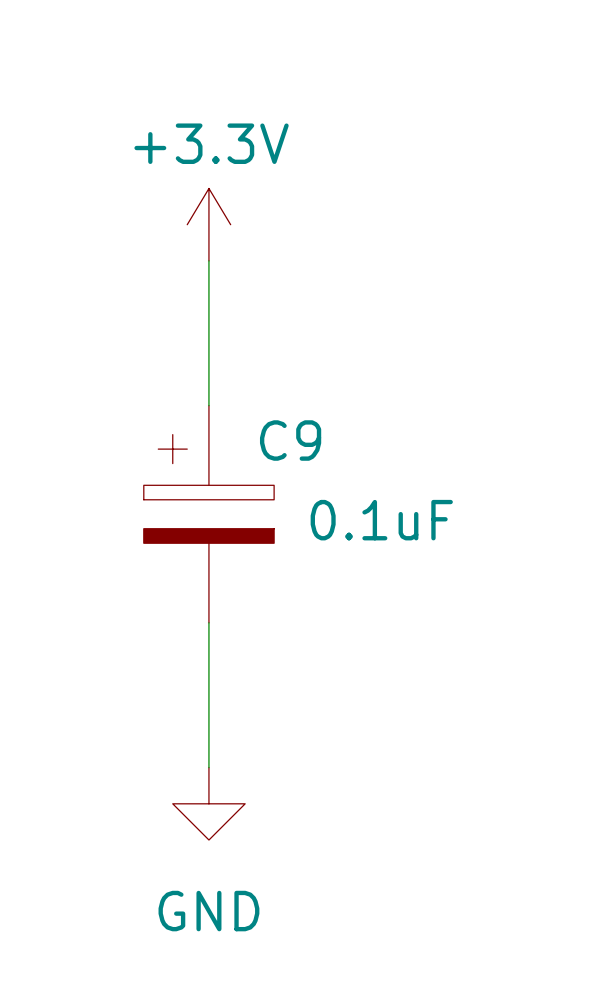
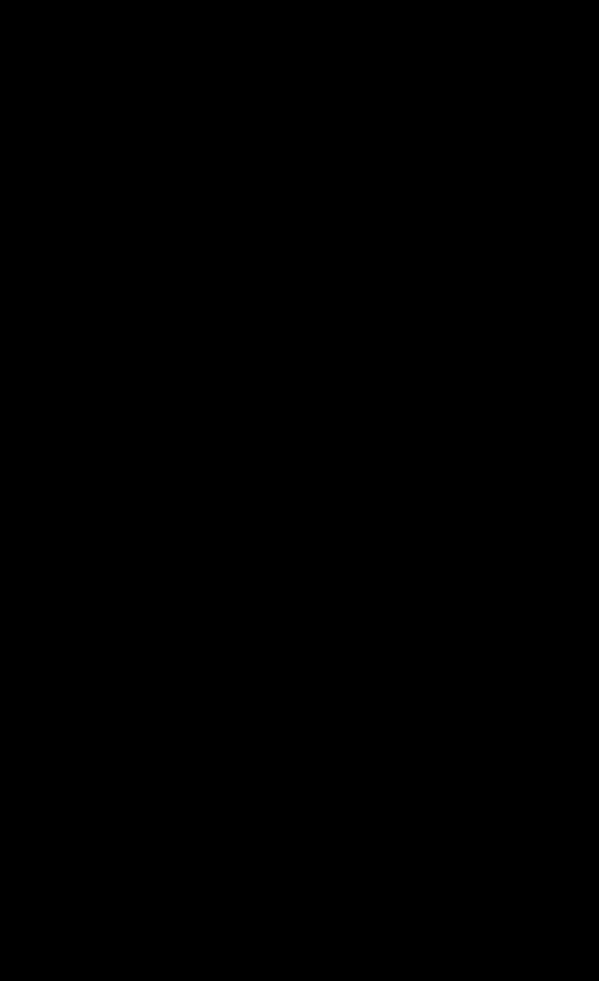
power symbol: +3.3V (208, 224) -> none
wire: (208, 260) (208, 405) -> none
C9: 0.1uF (208, 514) -> none
wire: (208, 622) (208, 767) -> none
power symbol: GND (208, 803) -> none

